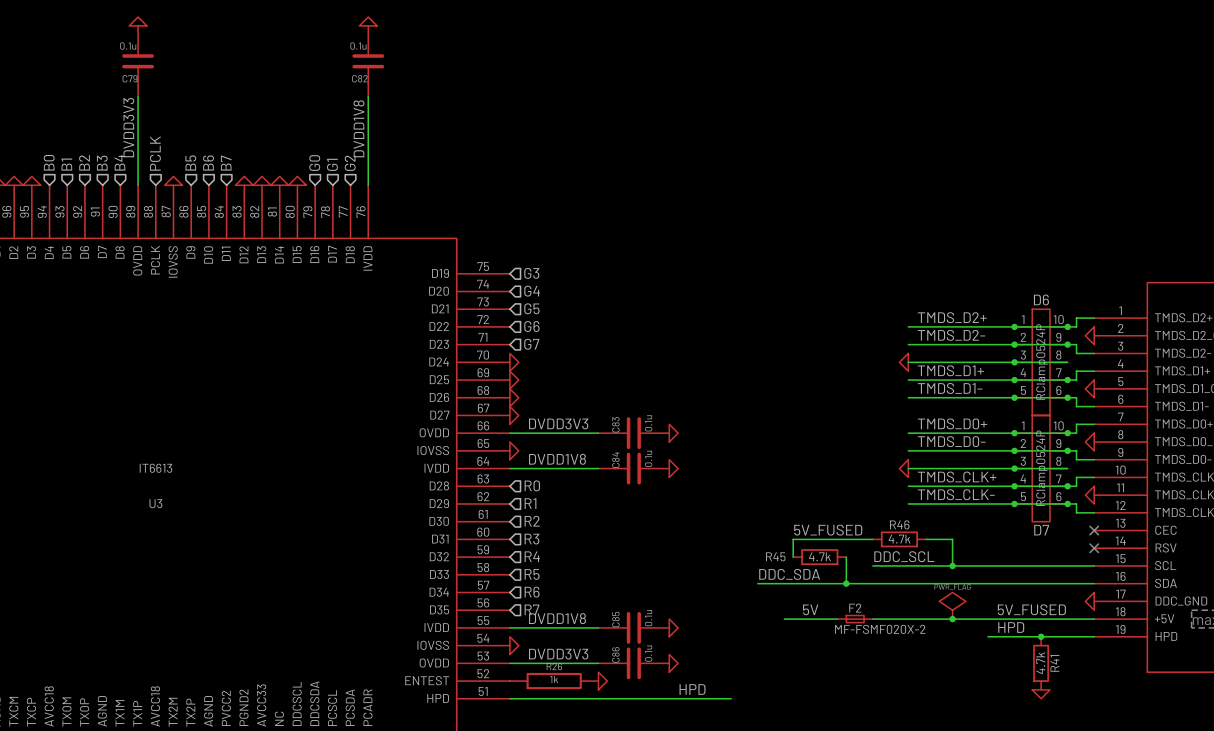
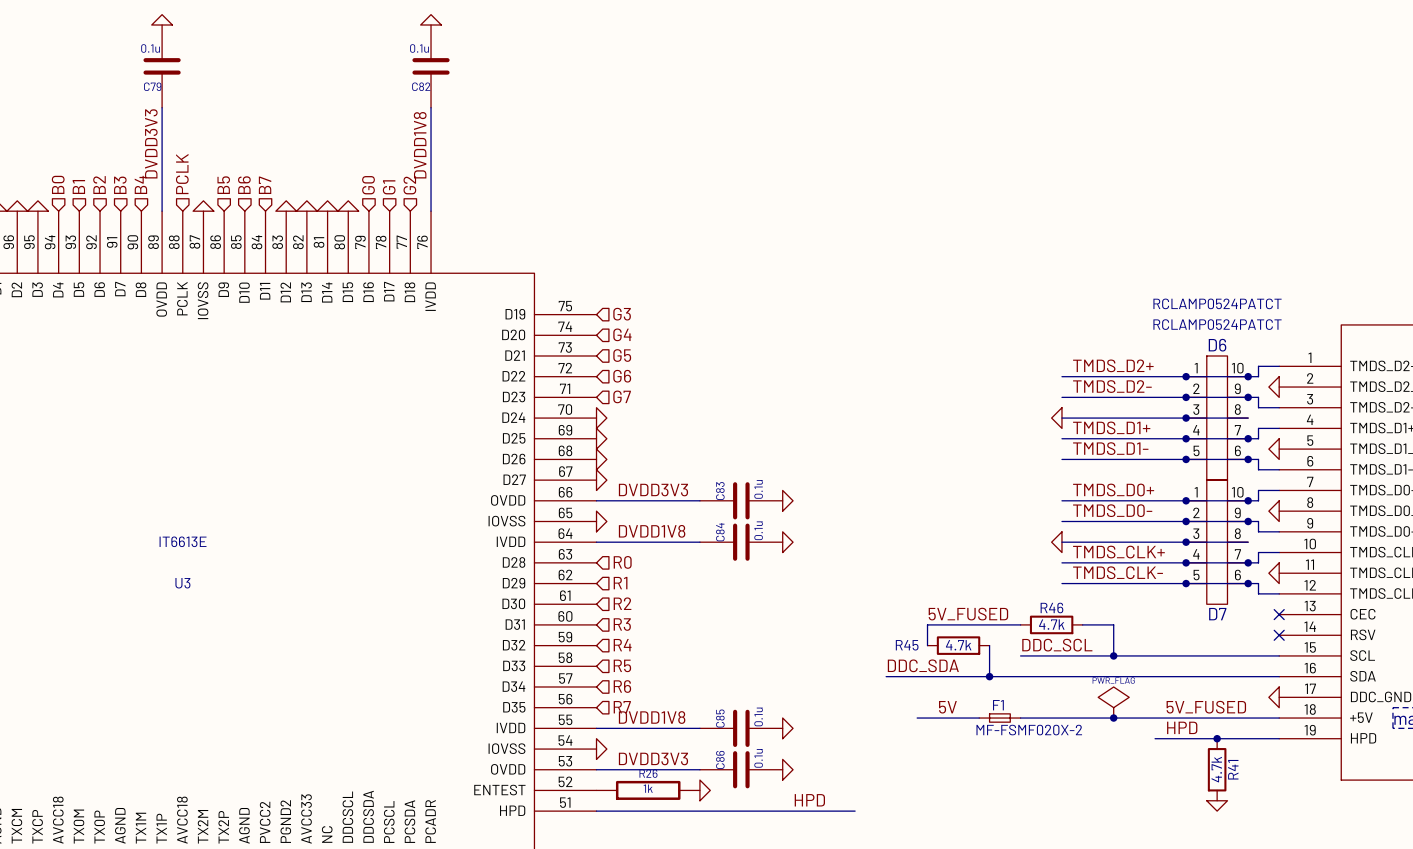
D6 value: RClamp0524P (1041, 361) -> RCLAMP0524PATCT (1217, 324)
U3 value: IT6613 (155, 468) -> IT6613E (183, 541)
D7 value: RClamp0524P (1041, 468) -> RCLAMP0524PATCT (1217, 303)
F2 name: F2 (855, 608) -> F1 (998, 705)

